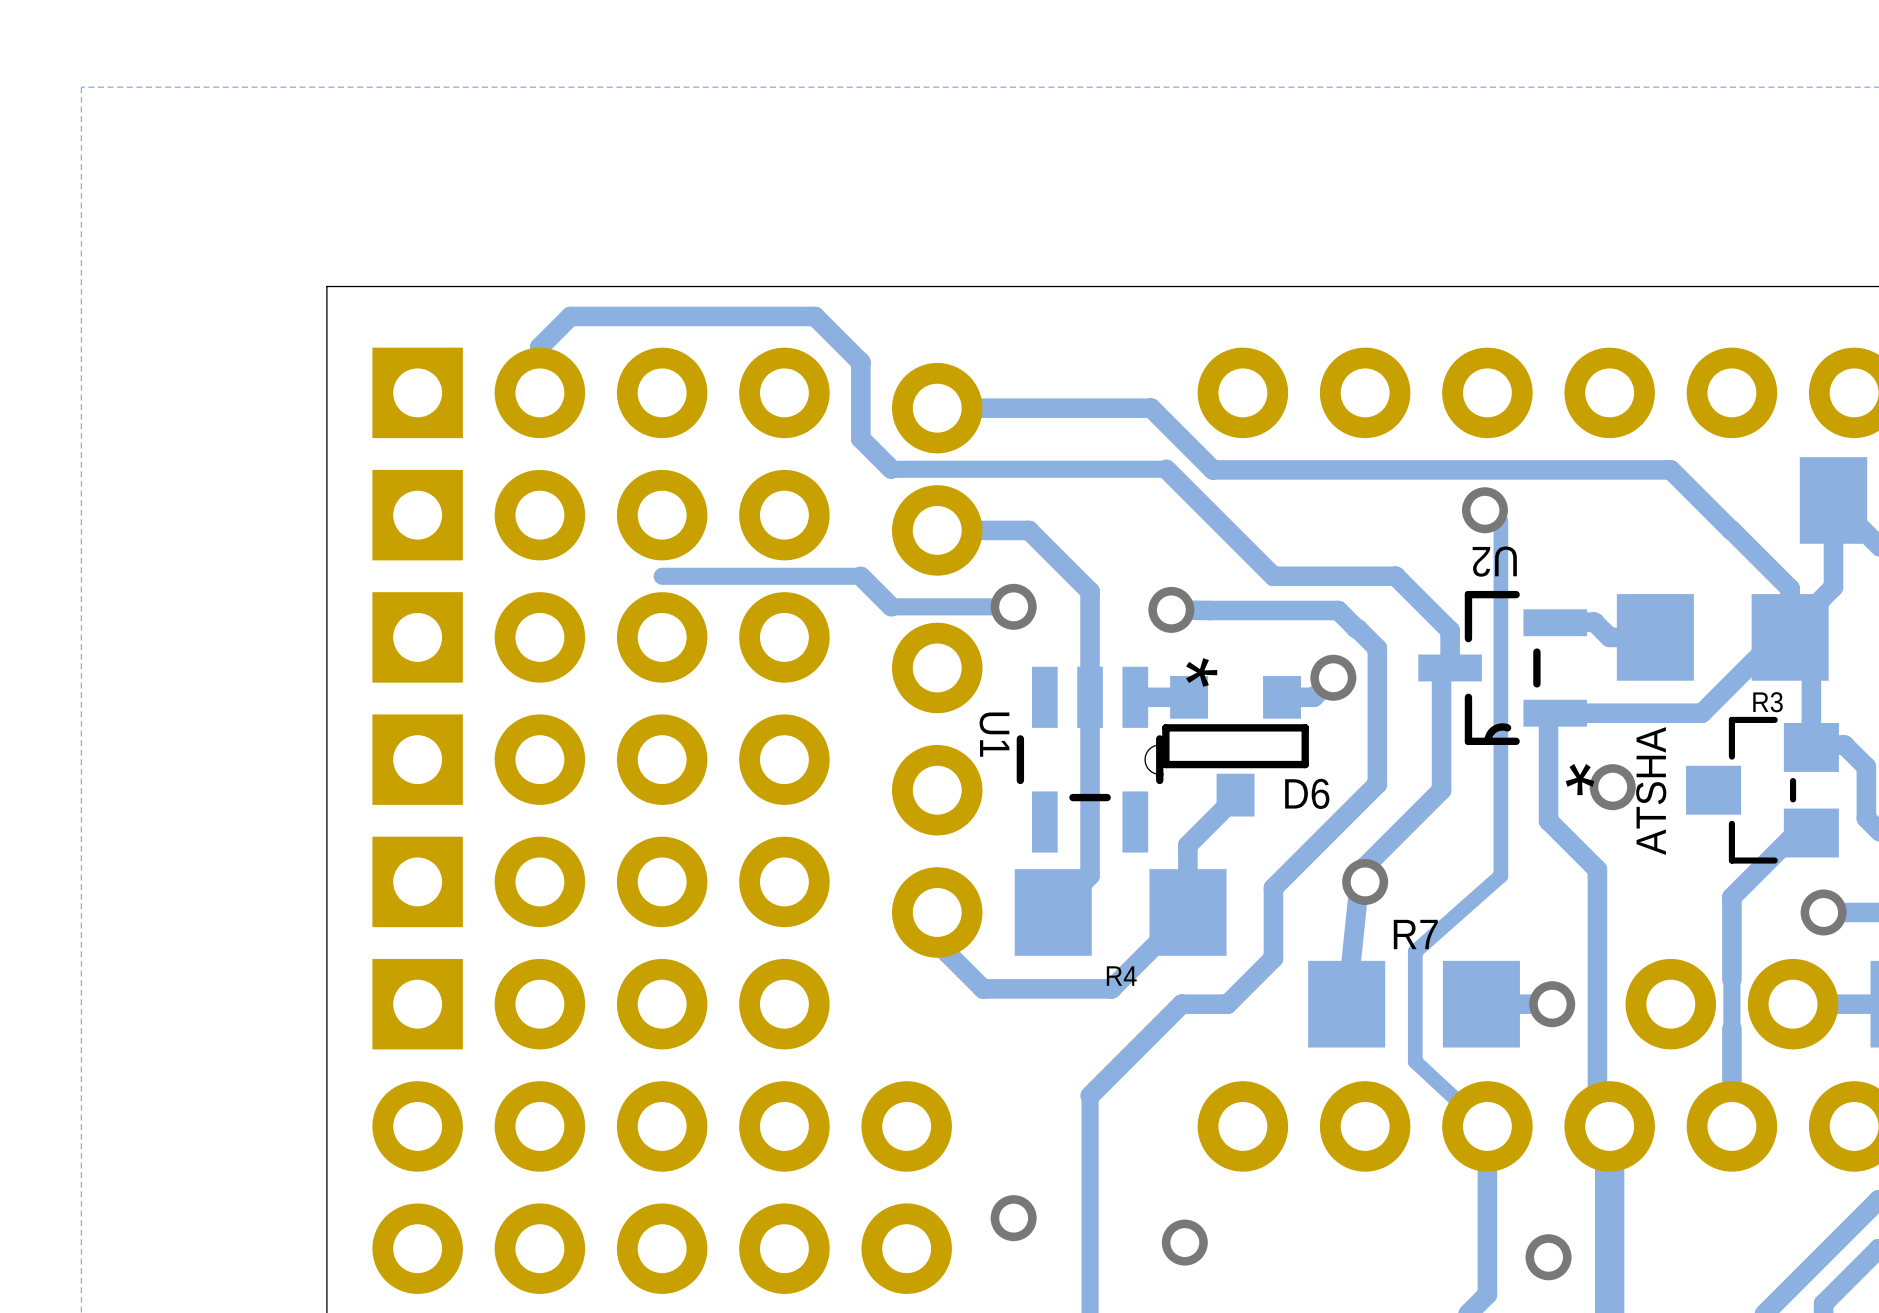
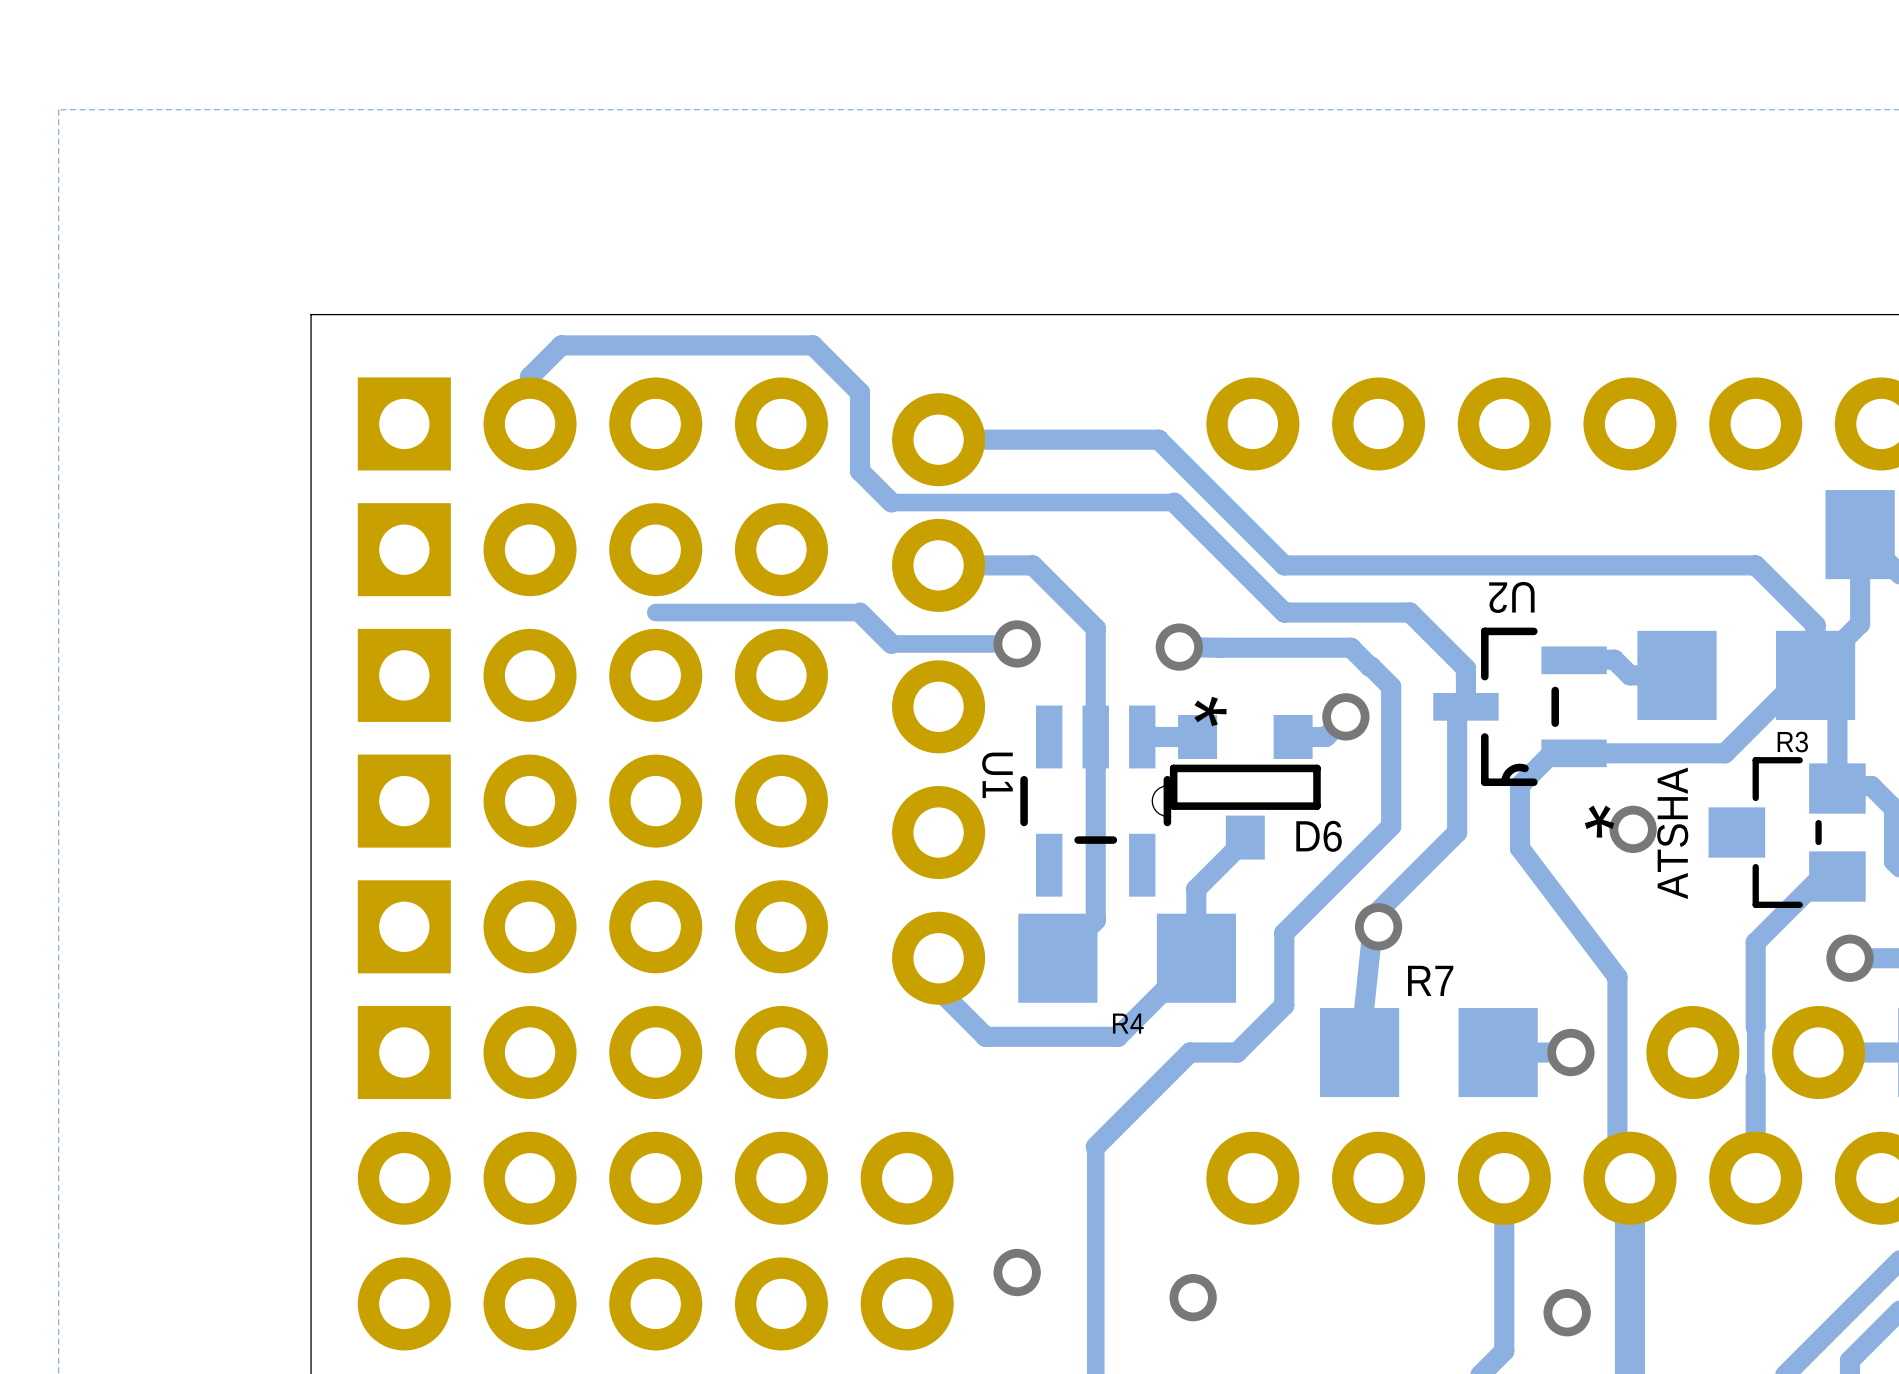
track: (1212, 469) (1670, 469) (1731, 530) -> (1222, 503) (1284, 565) (1755, 565)
track: (1484, 510) (1500, 521) (1500, 875) (1415, 951) (1415, 1061) (1484, 1126) (1487, 1126) -> none
via: (1484, 510) -> none
track: (1554, 713) (1548, 719) (1548, 820) (1597, 869) (1597, 930) -> (1573, 753) (1551, 753) (1520, 785) (1520, 848) (1617, 977)

